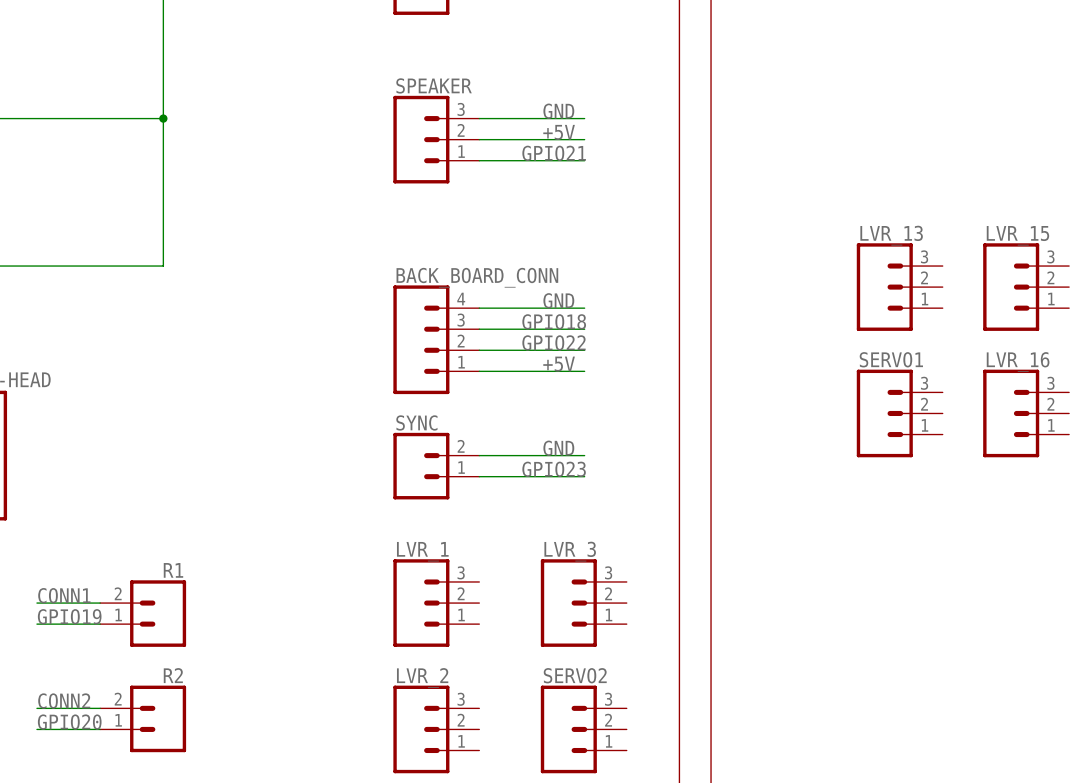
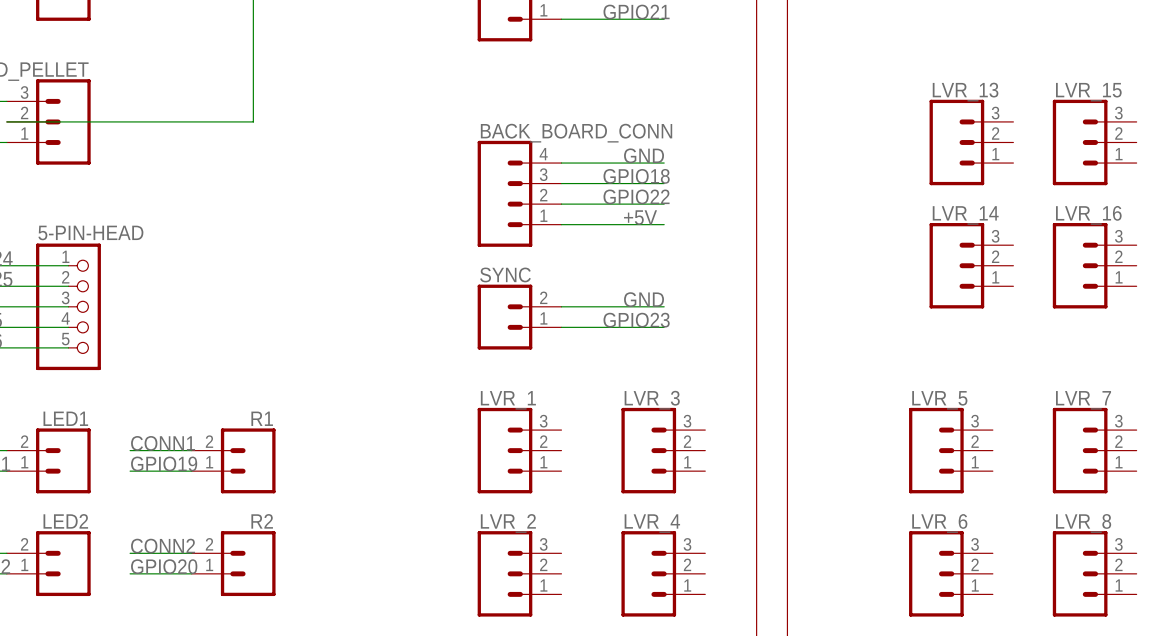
SERVO1 name: SERVO1 (891, 359) -> LVR_14 (965, 215)
LVR_5: none -> (950, 450)
LVR_7: none -> (1094, 450)
SERVO2 name: SERVO2 (575, 675) -> LVR_4 (652, 523)
LVR_6: none -> (950, 573)
LVR_8: none -> (1094, 573)

